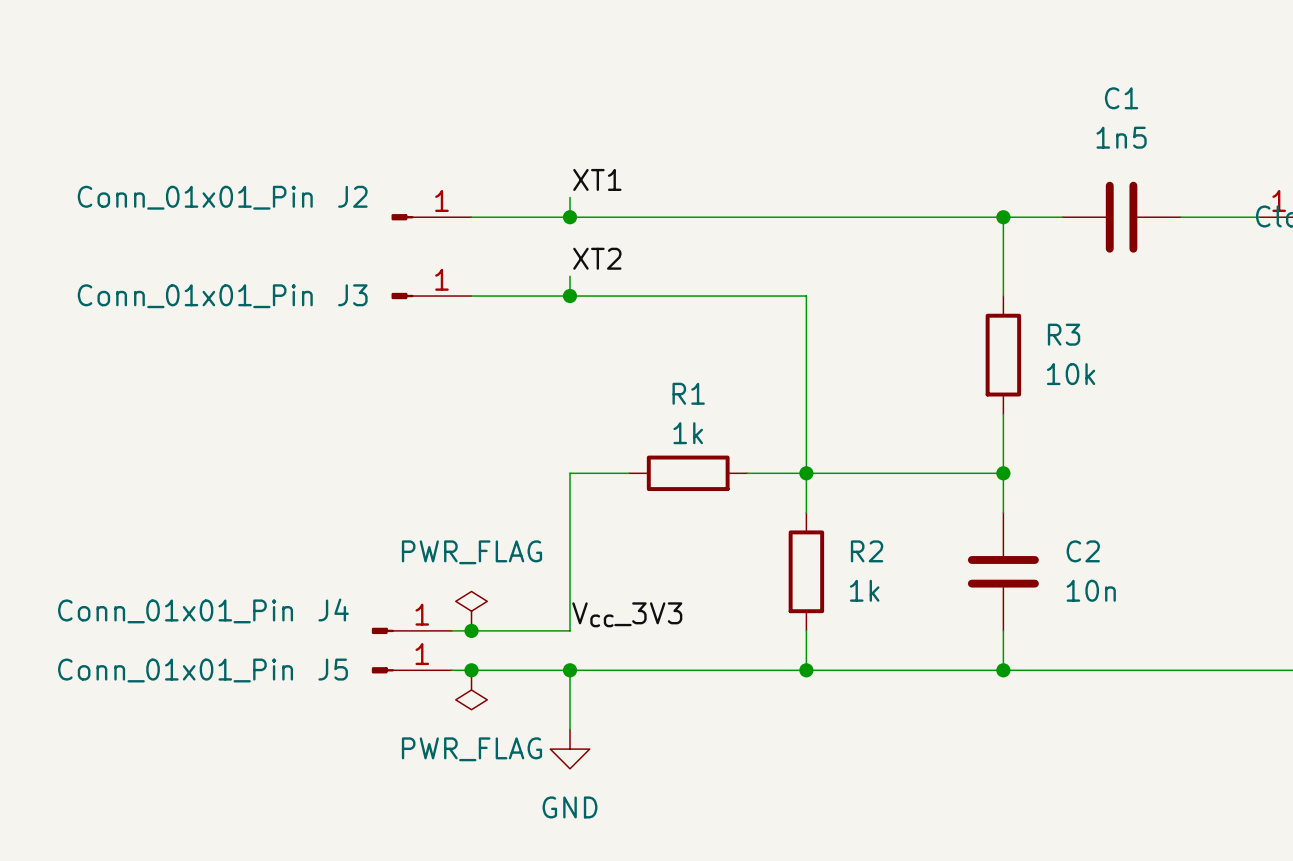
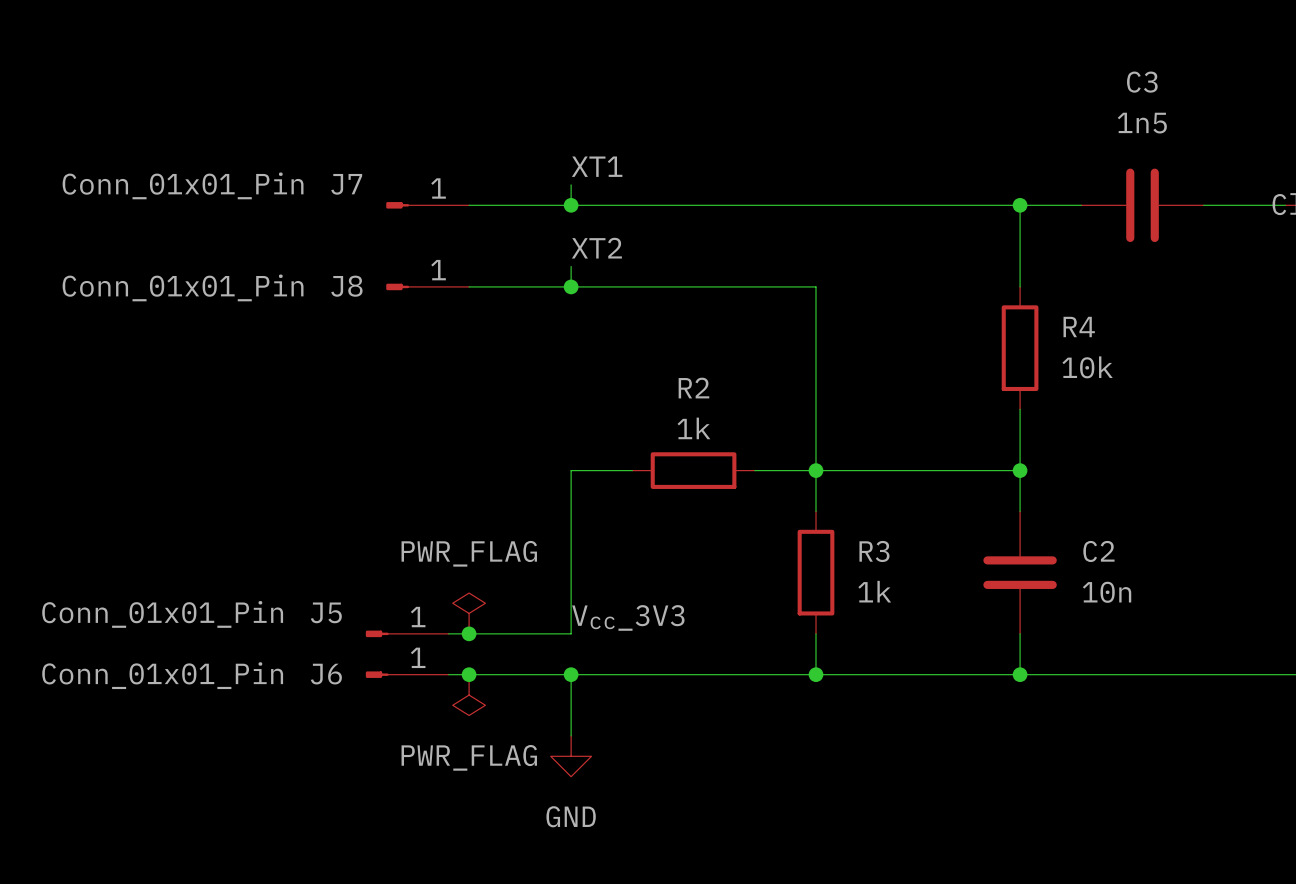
C1 name: C1 (1121, 98) -> C3 (1142, 82)
J2 name: J2 (352, 196) -> J7 (346, 184)
J3 name: J3 (352, 295) -> J8 (346, 286)
R3 name: R3 (1064, 334) -> R4 (1079, 326)
R1 name: R1 (688, 393) -> R2 (693, 388)
R2 name: R2 (867, 551) -> R3 (874, 551)
J4 name: J4 (333, 610) -> J5 (326, 612)
J5 name: J5 (333, 669) -> J6 (326, 674)

